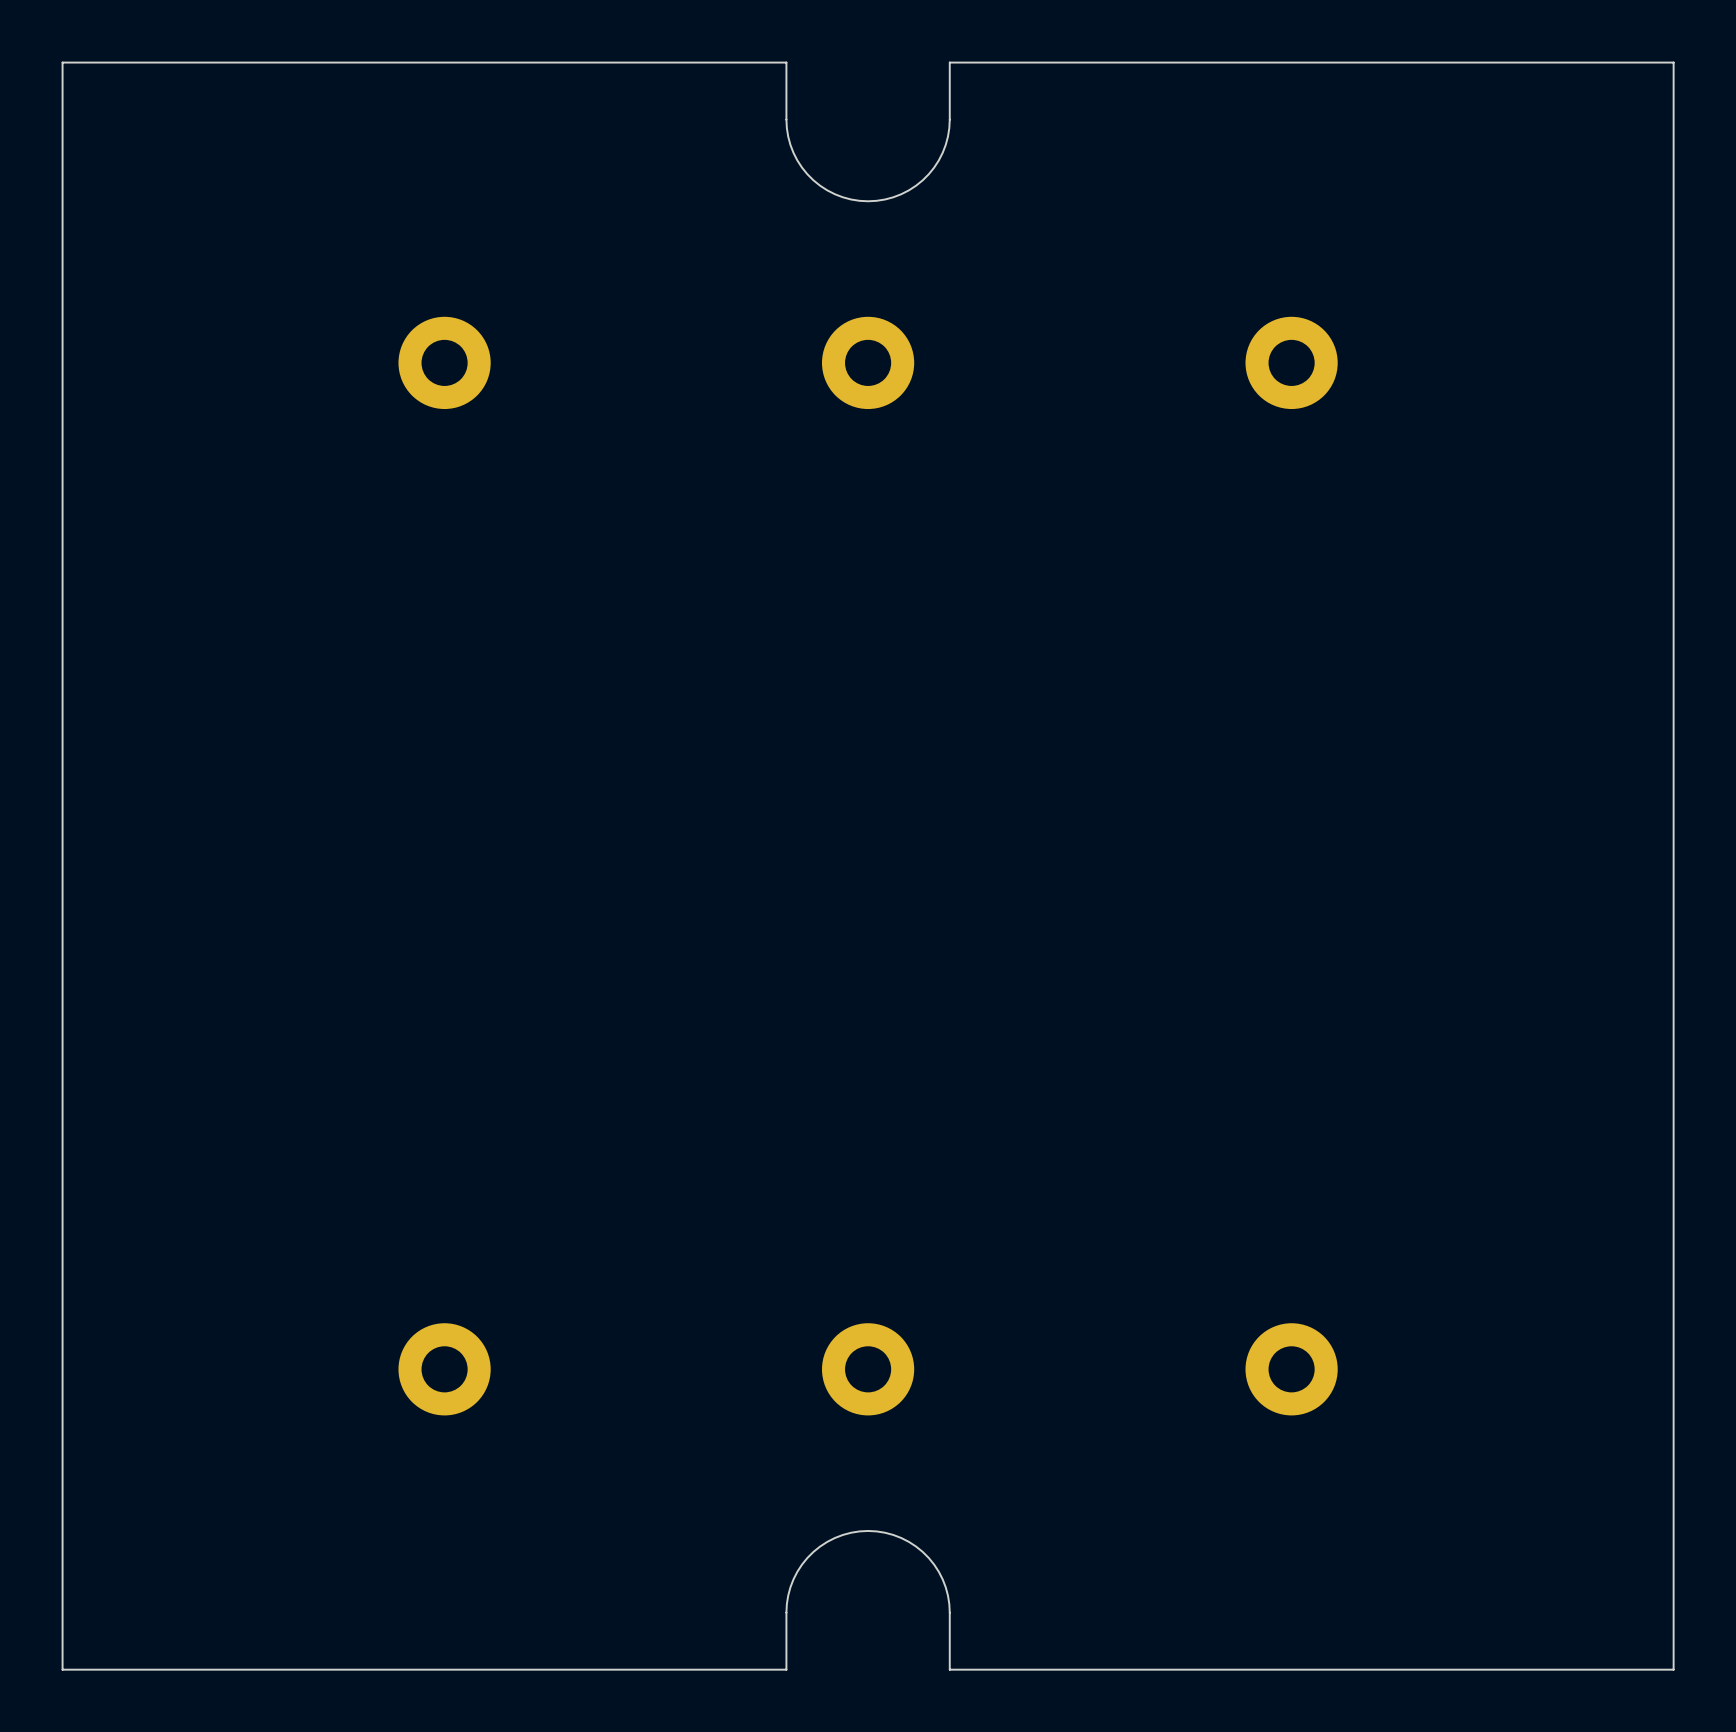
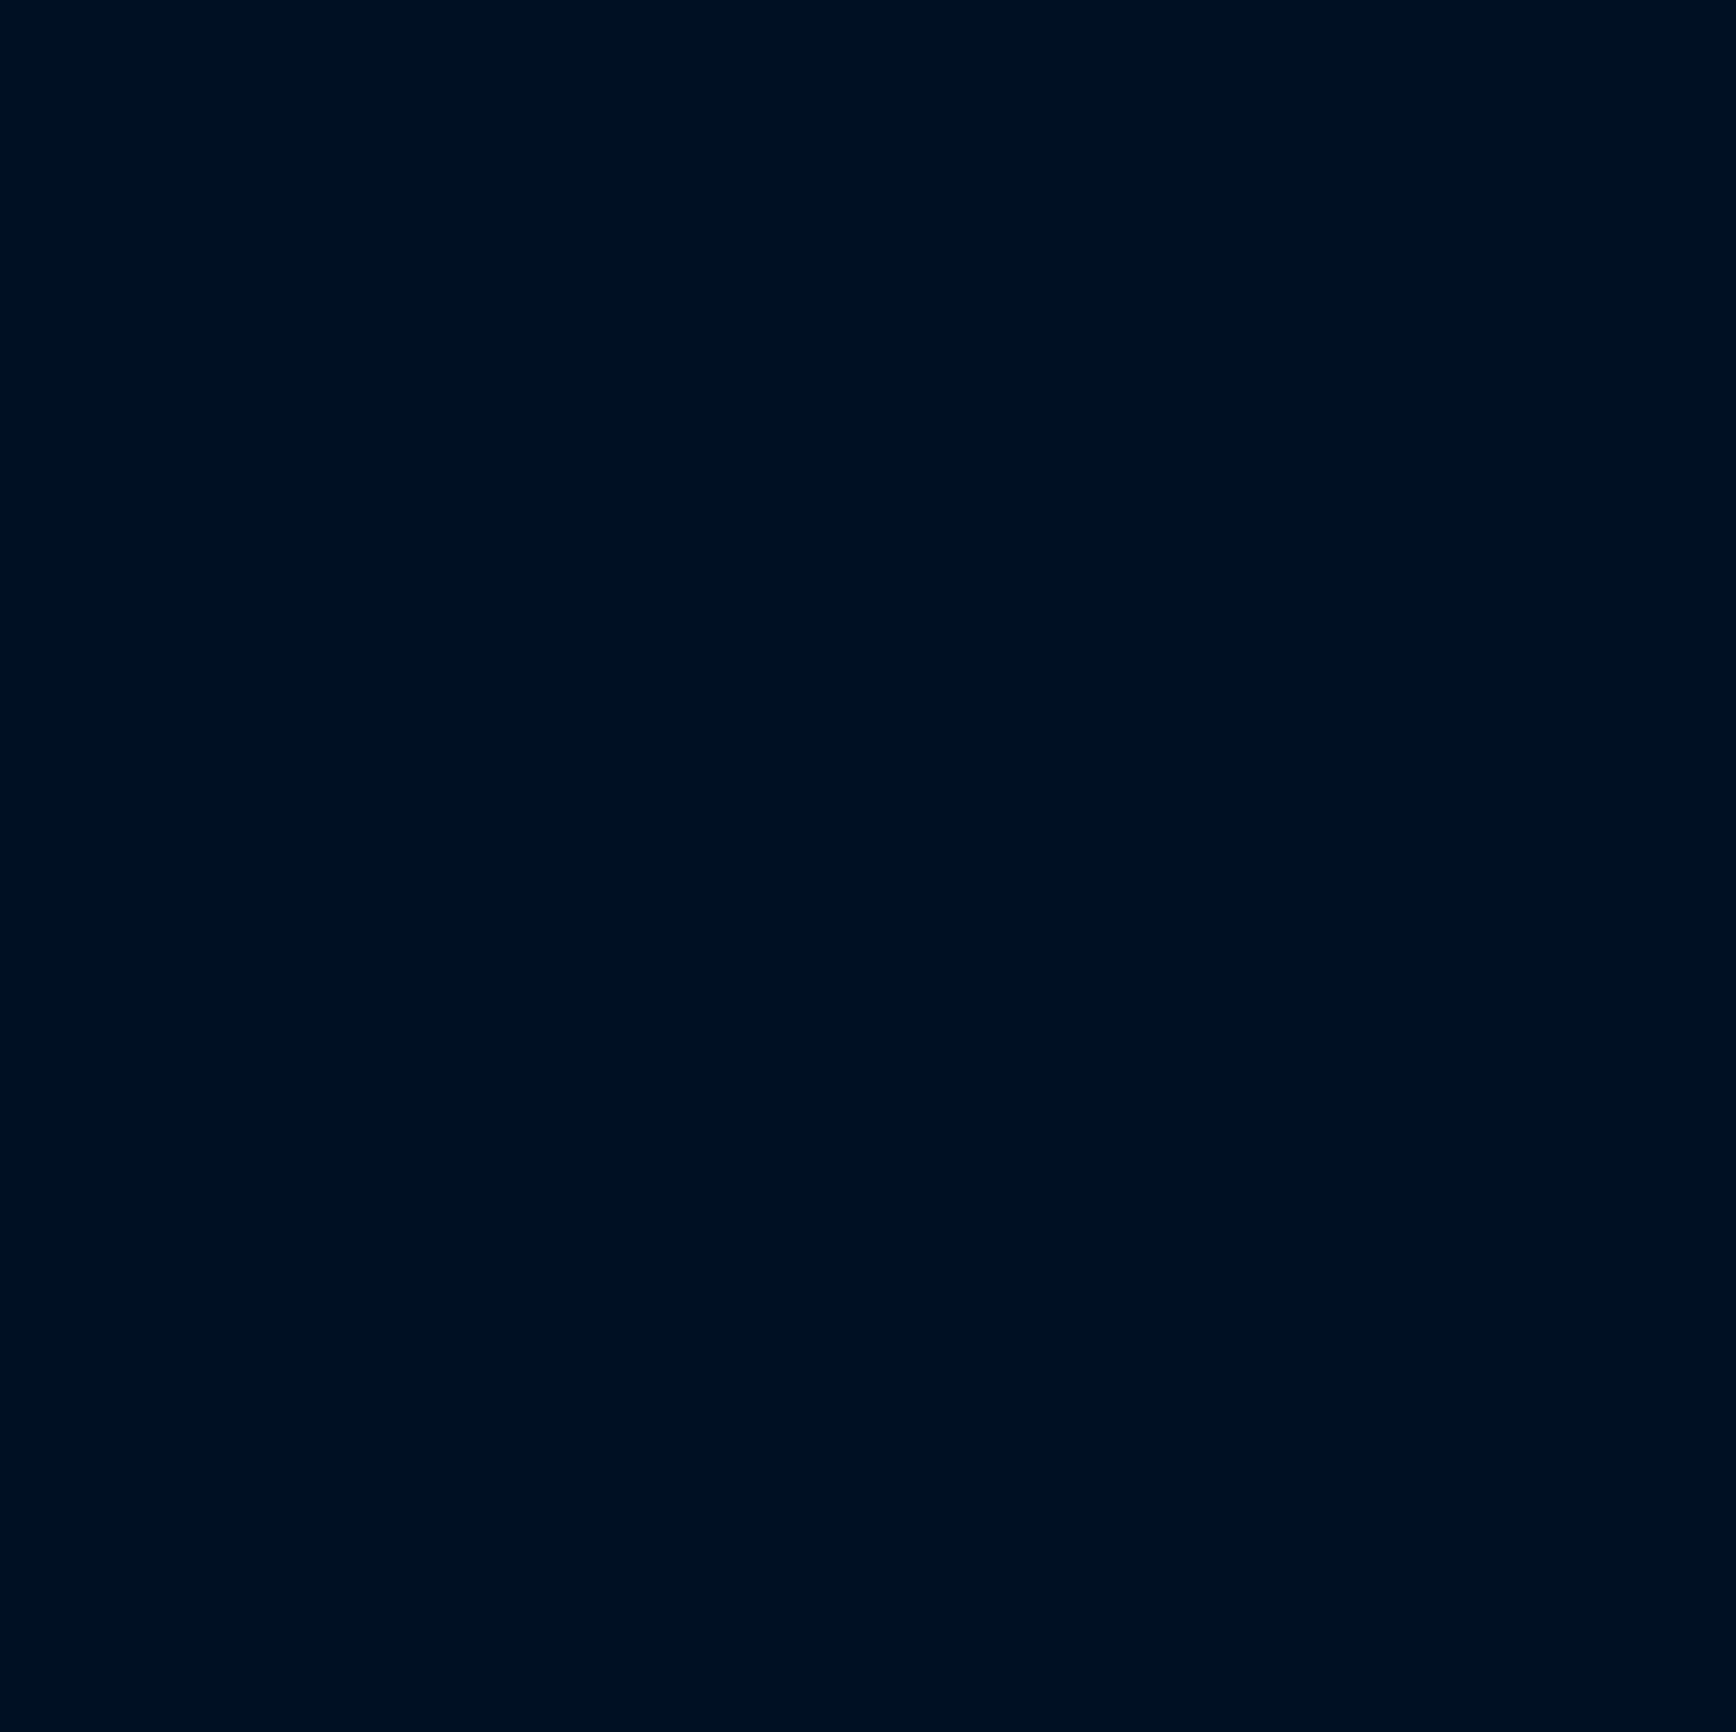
board edge: (1673, 62) (949, 62) (949, 128) (945, 144) (938, 160) (922, 180) (908, 190) (885, 199) (868, 201) (842, 197) (827, 190) (813, 180) (797, 160) (790, 144) (786, 128) (786, 62) (62, 62) (62, 1669) (786, 1669) (786, 1604) (790, 1587) (797, 1571) (813, 1551) (827, 1541) (851, 1532) (868, 1530) (885, 1532) (908, 1541) (922, 1551) (938, 1571) (945, 1587) (949, 1604) (949, 1669) (1673, 1669) (1673, 62) -> none
part: (444, 362) -> none
part: (868, 362) -> none
part: (1291, 362) -> none
part: (444, 1369) -> none
part: (868, 1369) -> none
part: (1291, 1369) -> none

